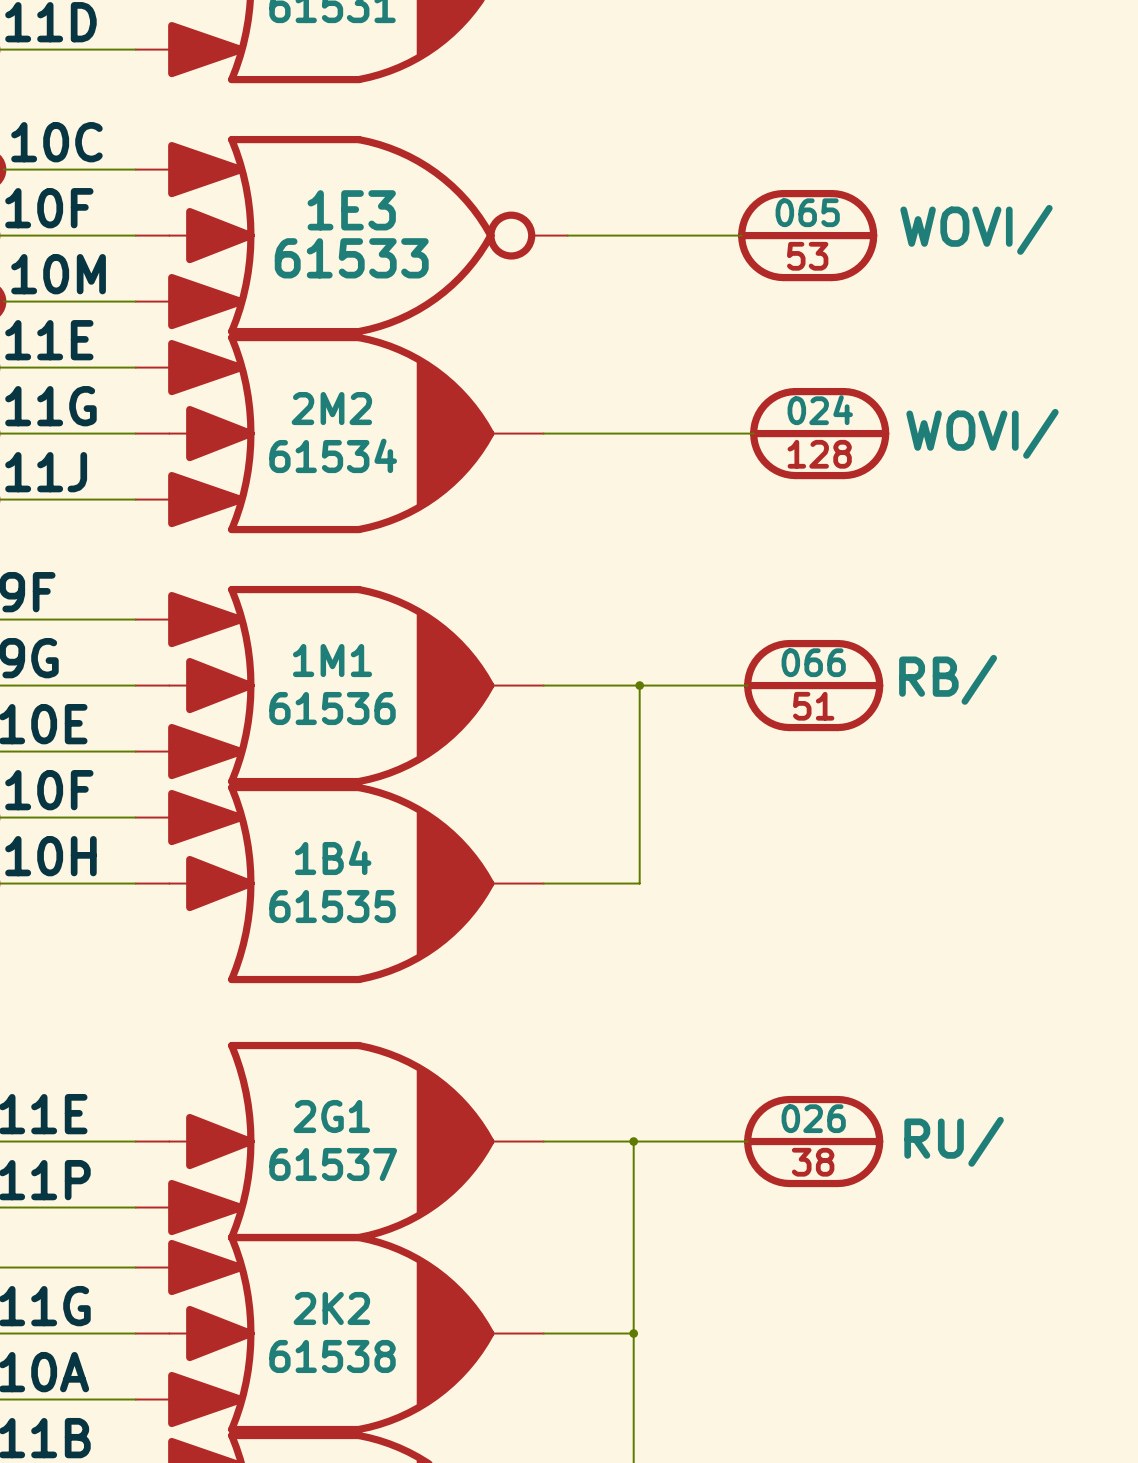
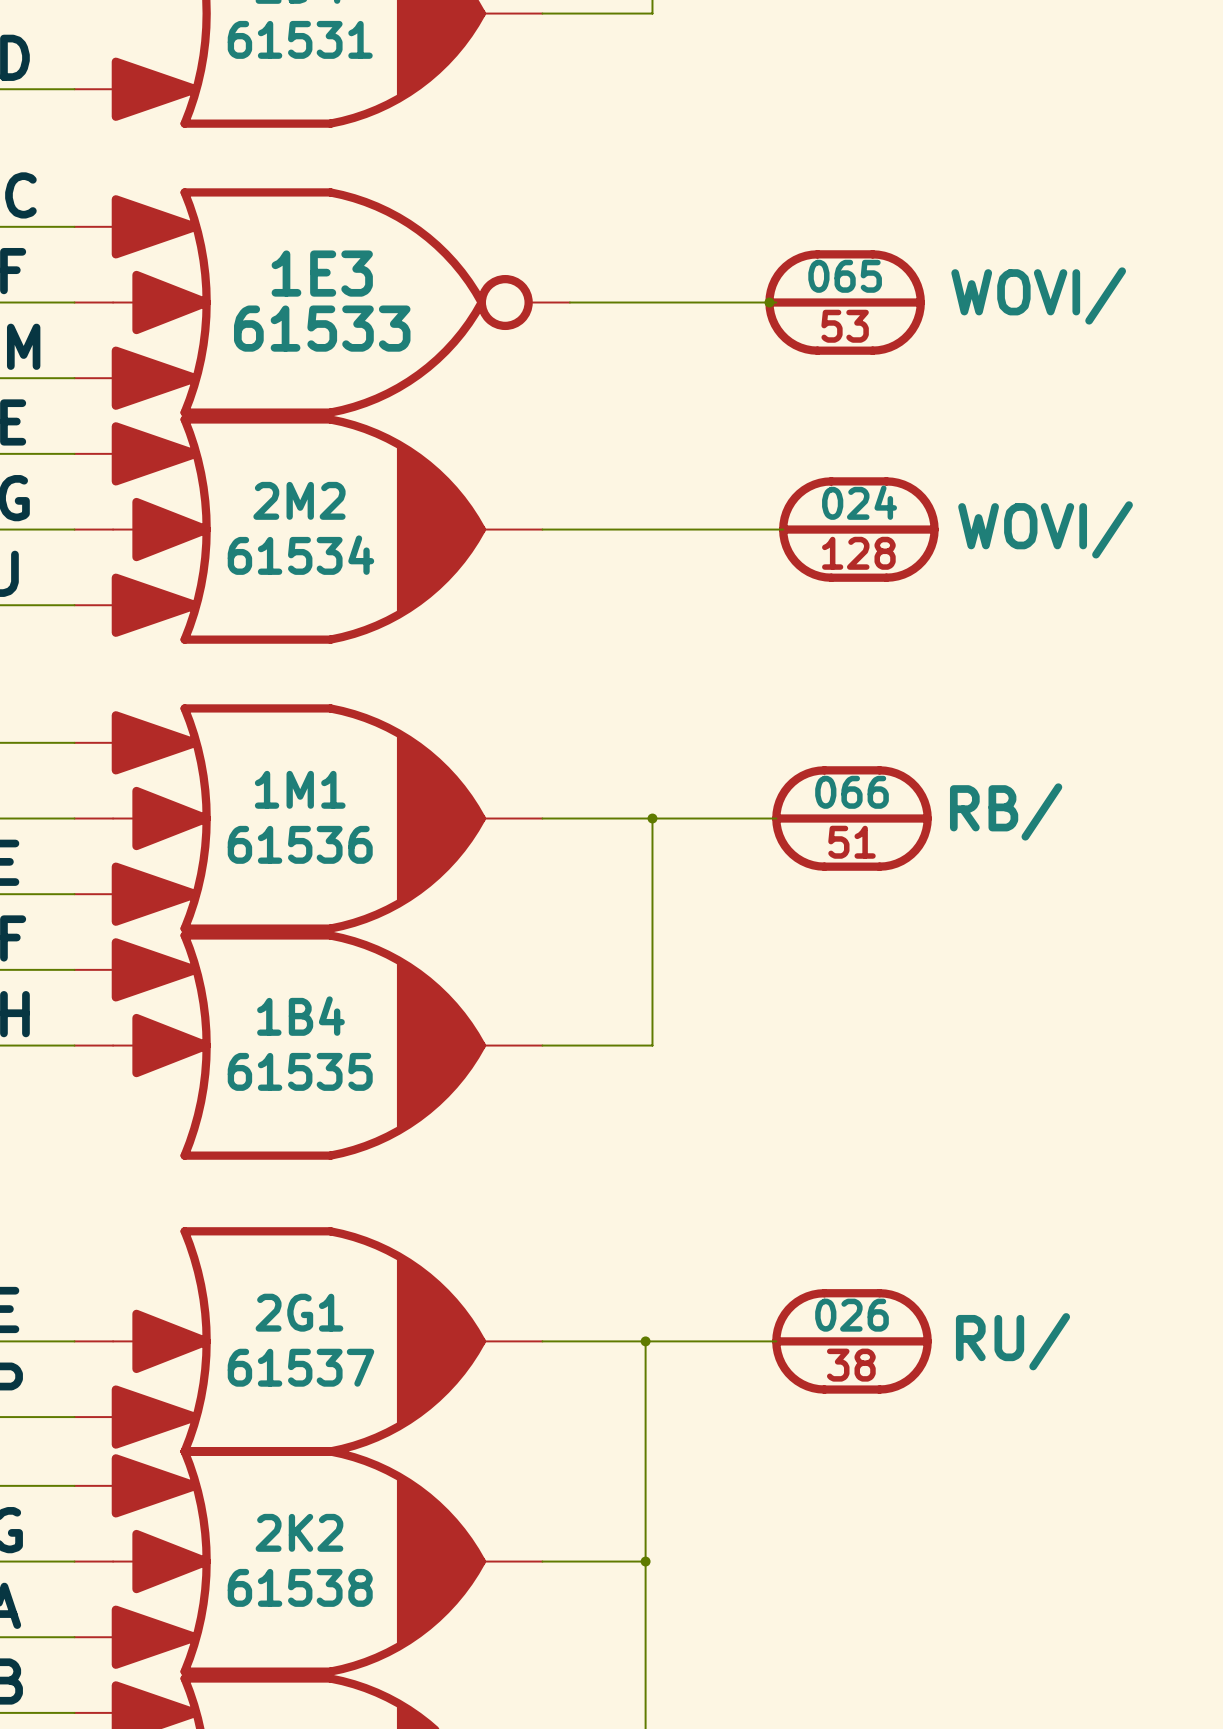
junction: none -> (769, 302)

